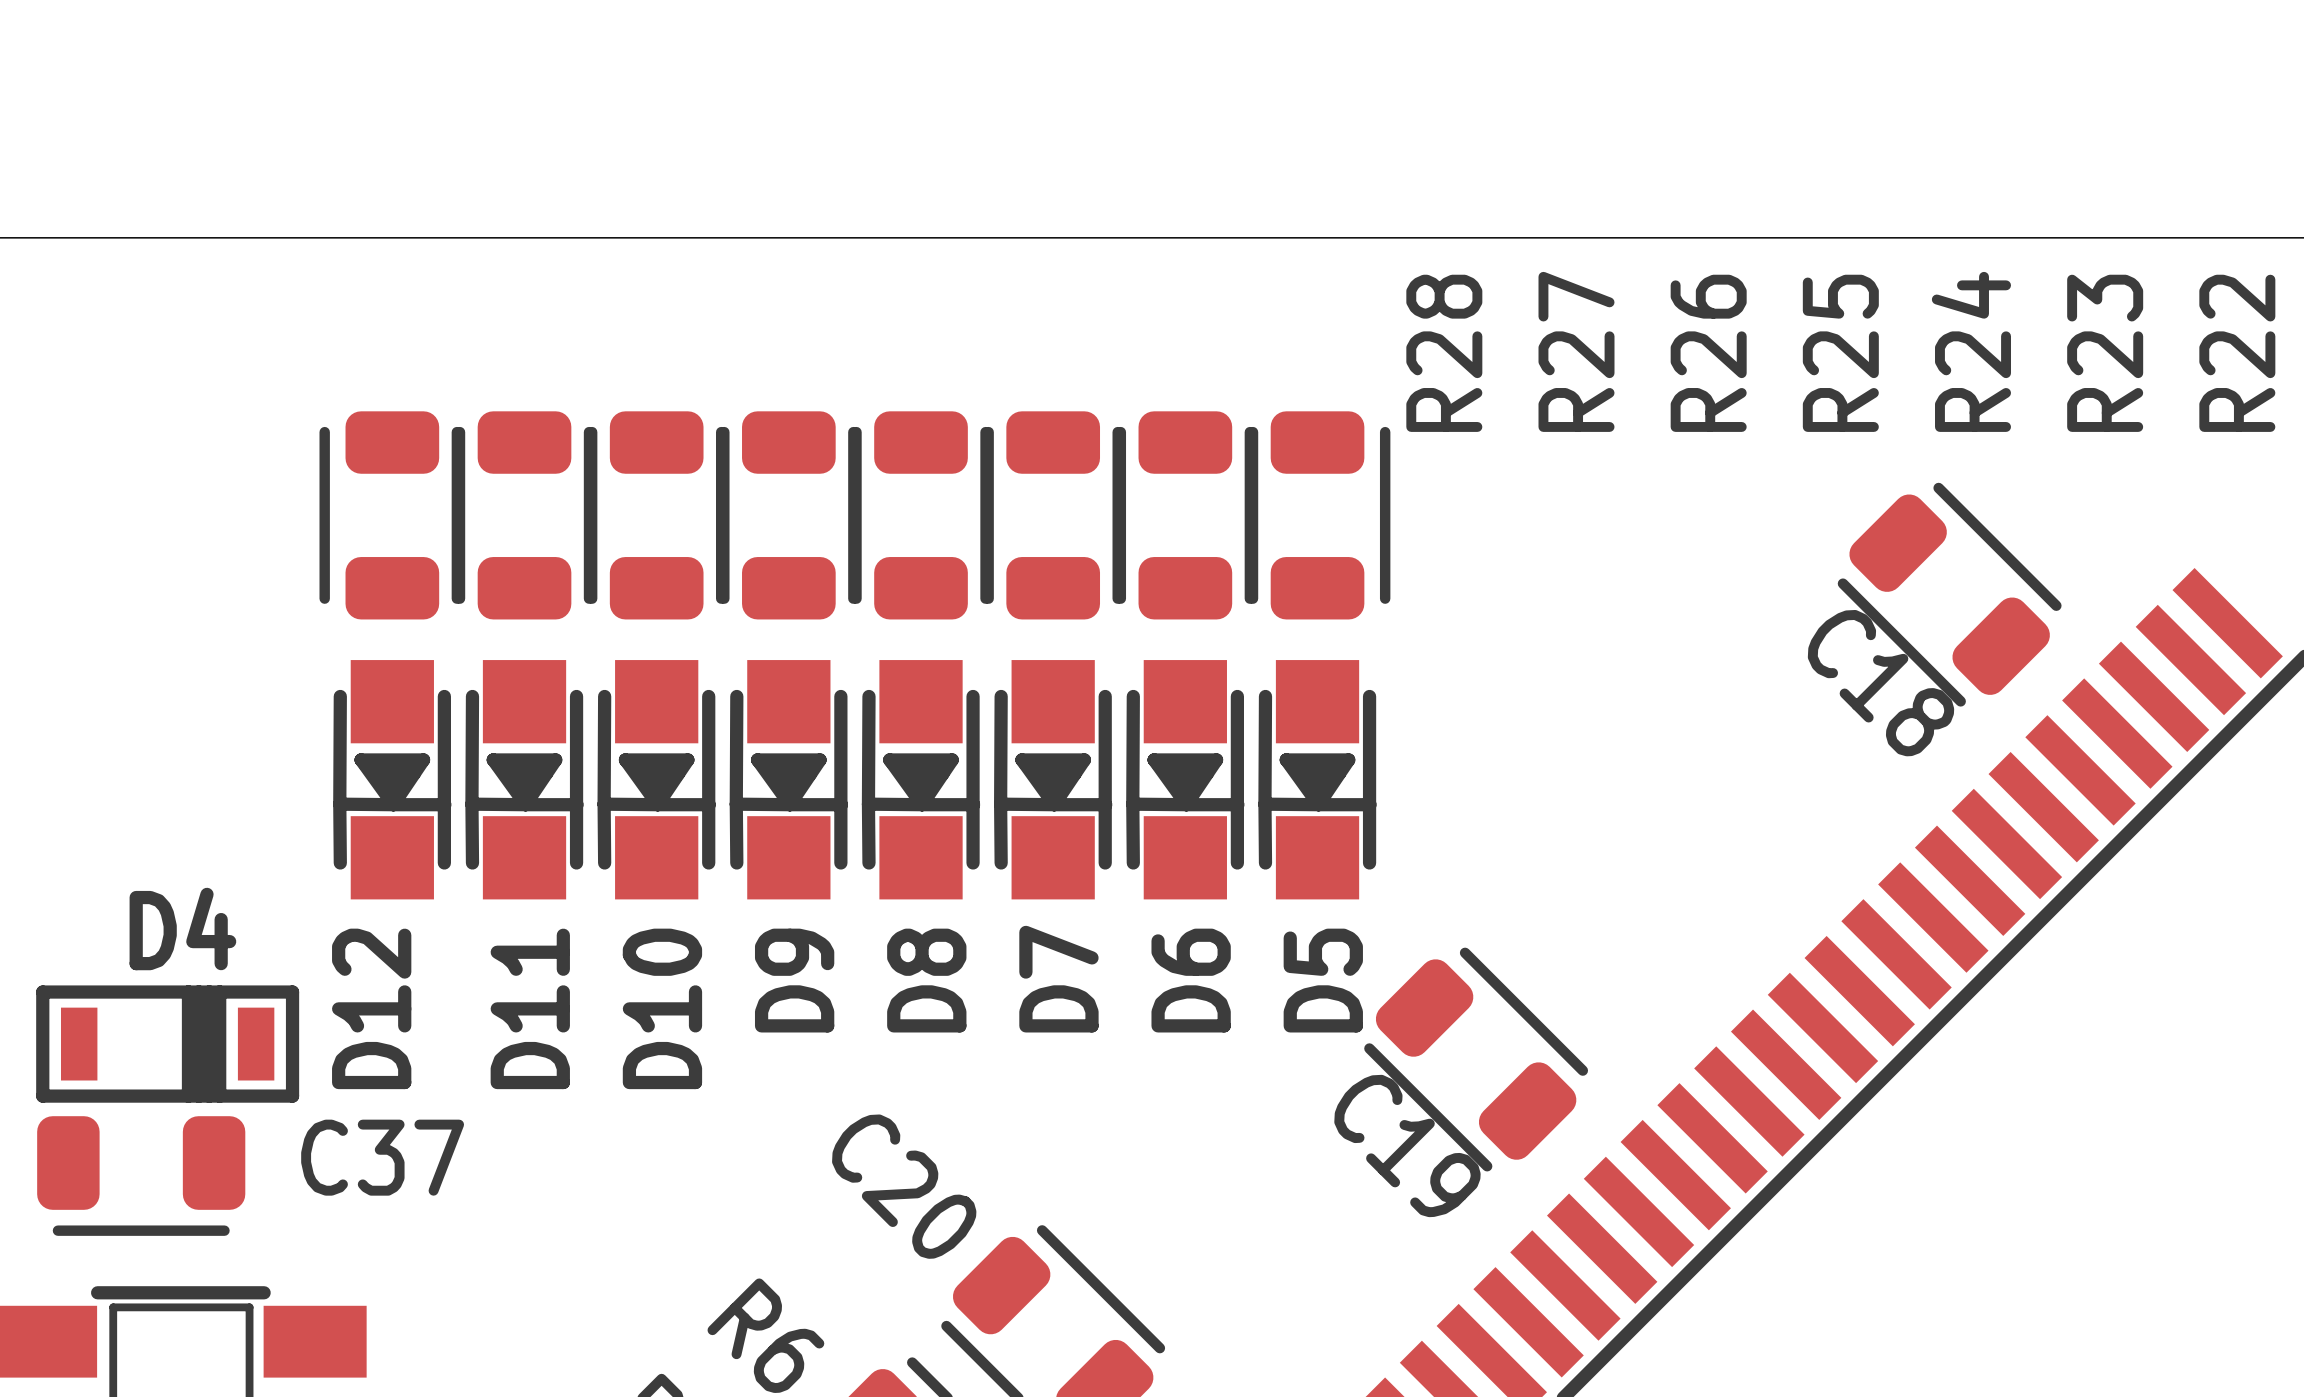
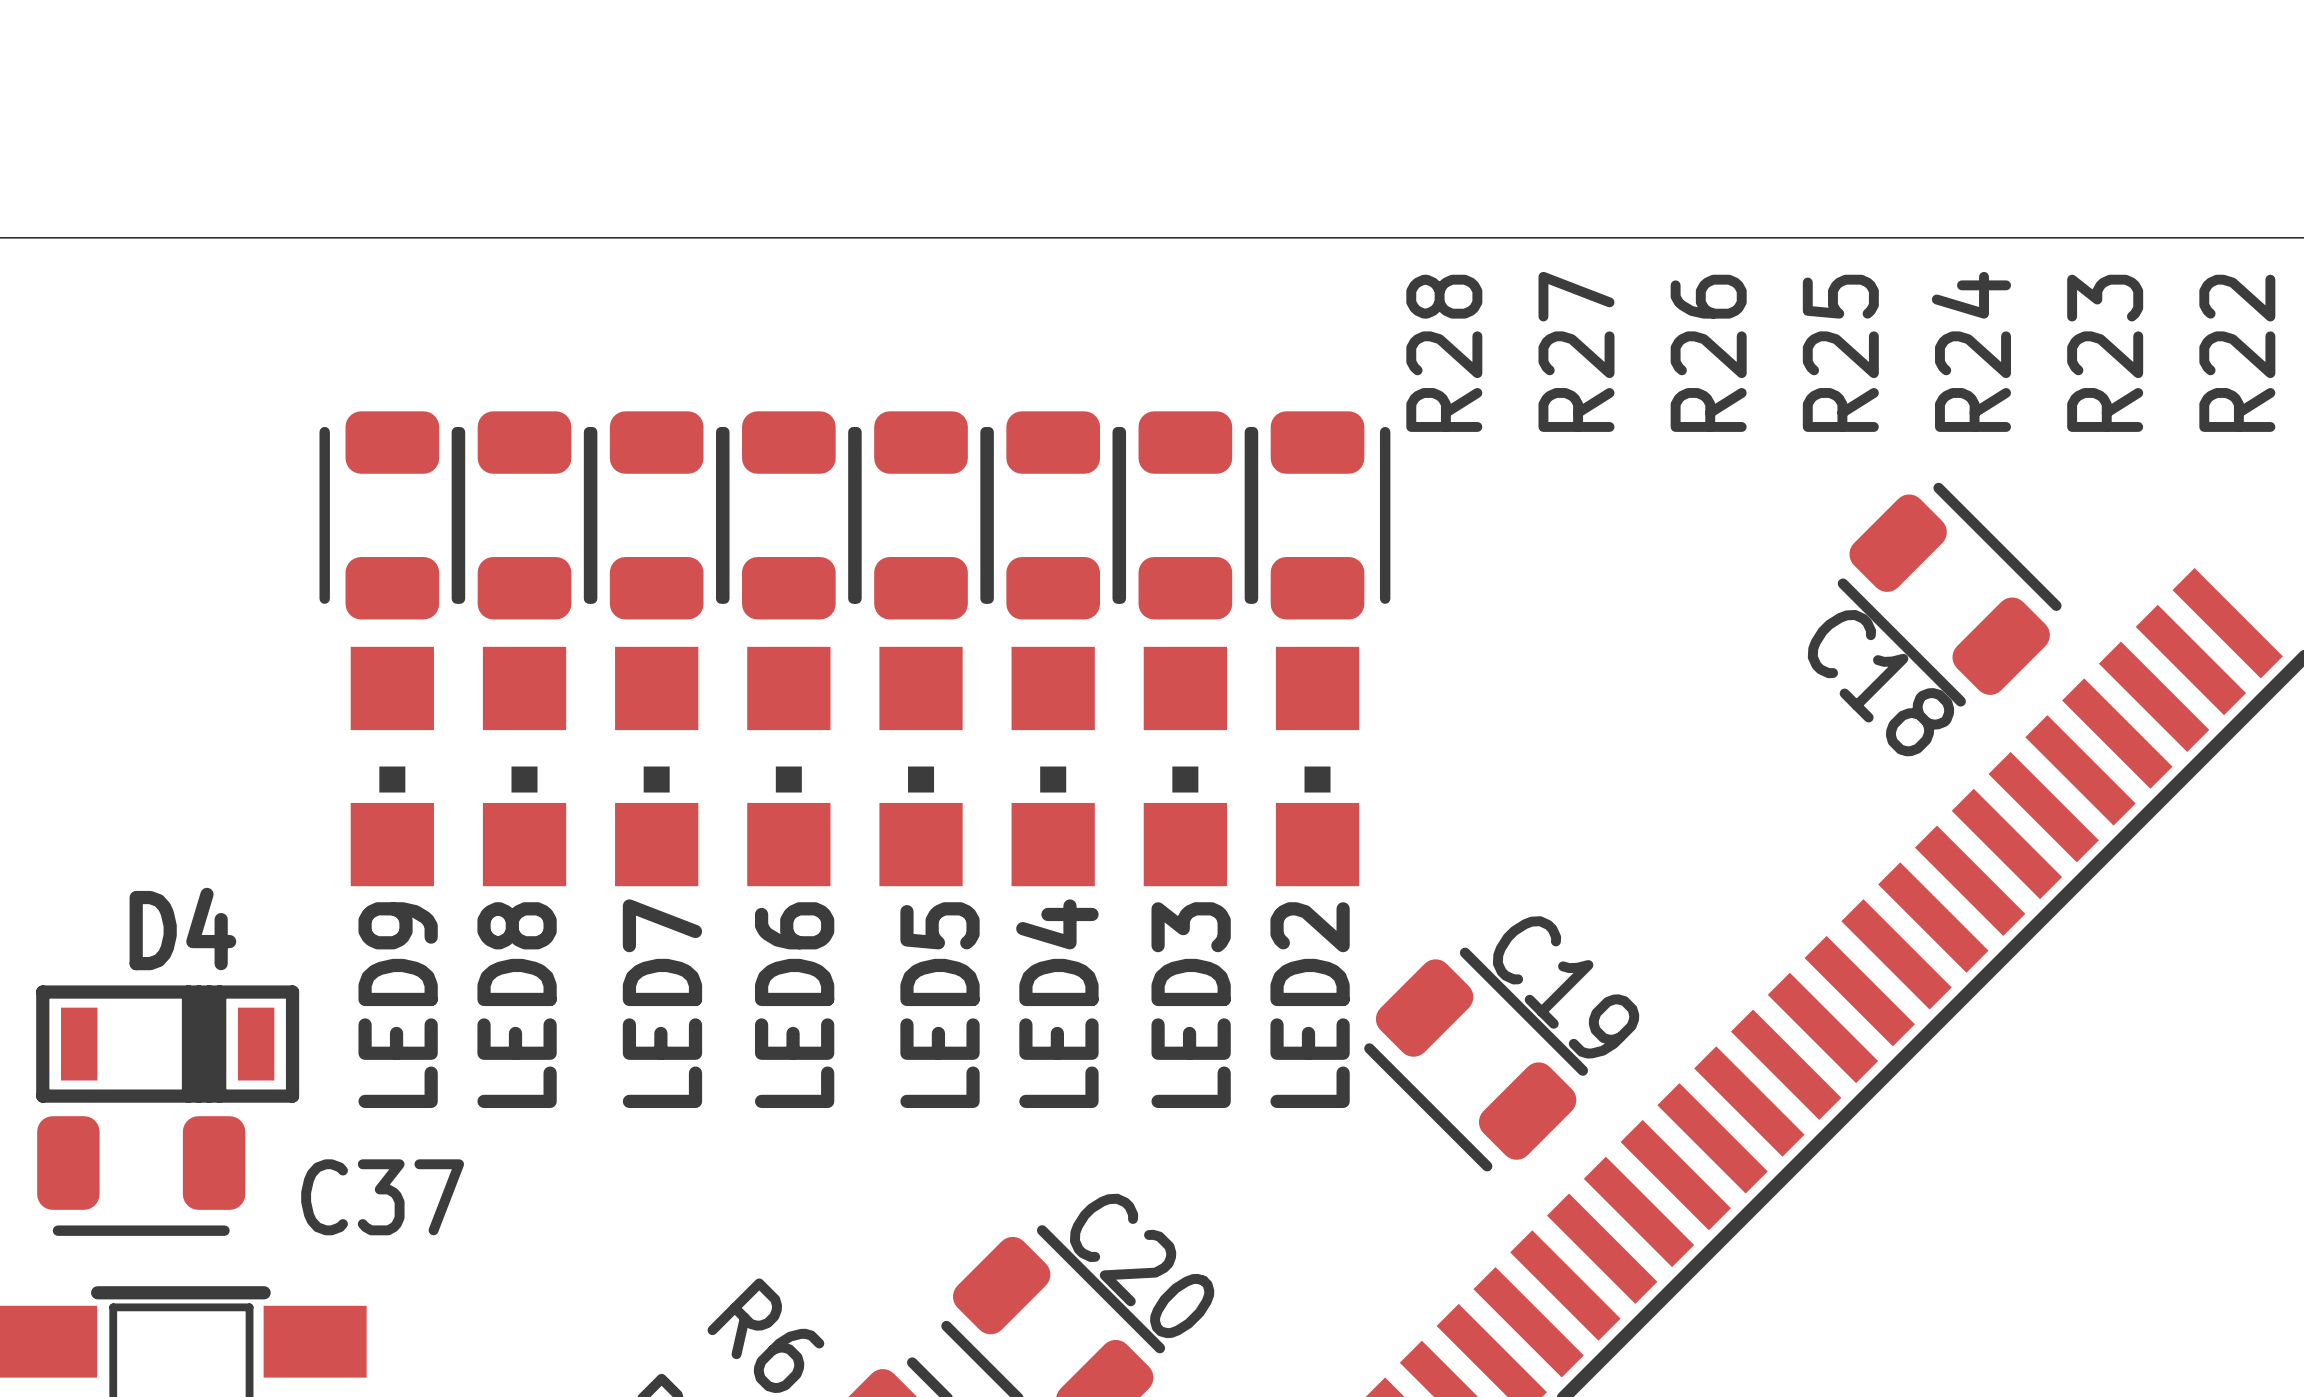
LED9: none -> (392, 766)
LED8: none -> (524, 766)
LED7: none -> (656, 766)
LED6: none -> (788, 766)
LED5: none -> (921, 766)
LED4: none -> (1053, 766)
LED3: none -> (1185, 766)
LED2: none -> (1317, 766)
D12: (392, 779) -> none
D11: (524, 779) -> none
D10: (656, 779) -> none
D9: (788, 779) -> none
D8: (921, 779) -> none
D7: (1053, 779) -> none
D6: (1185, 779) -> none
D5: (1317, 779) -> none
C19 name position: C19 (1407, 1146) -> C19 (1566, 987)
C37 name position: C37 (382, 1157) -> C37 (382, 1197)
C20 name position: C20 (904, 1186) -> C20 (1142, 1265)

